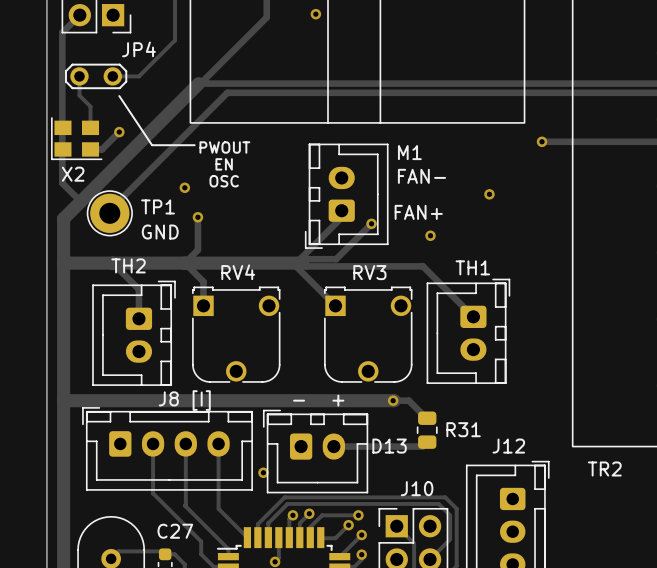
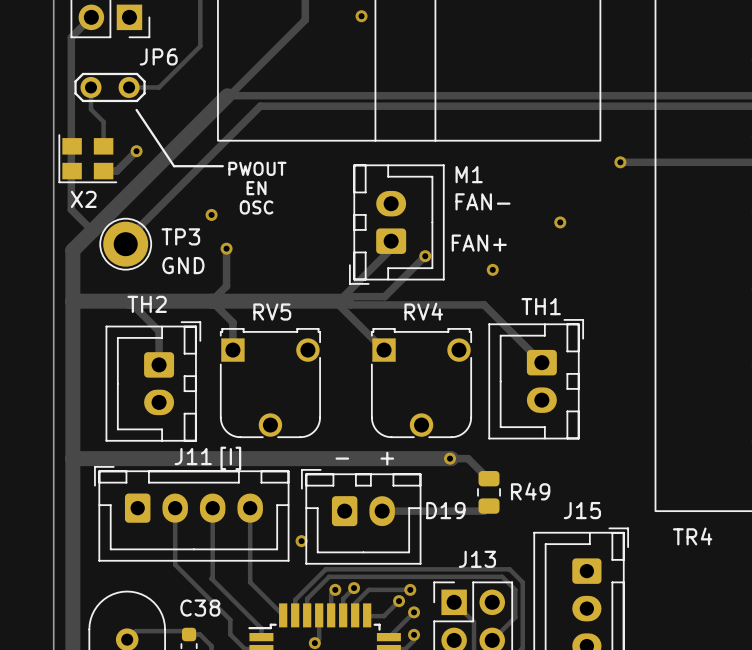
JP4 name: JP4 (138, 49) -> JP6 (158, 56)
TP1 name: TP1 (158, 206) -> TP3 (180, 236)
RV4 name: RV4 (238, 272) -> RV5 (272, 312)
RV3 name: RV3 (369, 272) -> RV4 (423, 311)
J8 name: J8 (168, 398) -> J11 (193, 456)
R31 name: R31 (463, 429) -> R49 (530, 491)
D13 name: D13 (389, 446) -> D19 (445, 510)
J12 name: J12 (508, 446) -> J15 (582, 510)
TR2 name: TR2 (604, 469) -> TR4 (692, 536)
J10 name: J10 (417, 488) -> J13 (477, 559)
C27 name: C27 (175, 531) -> C38 (200, 608)

